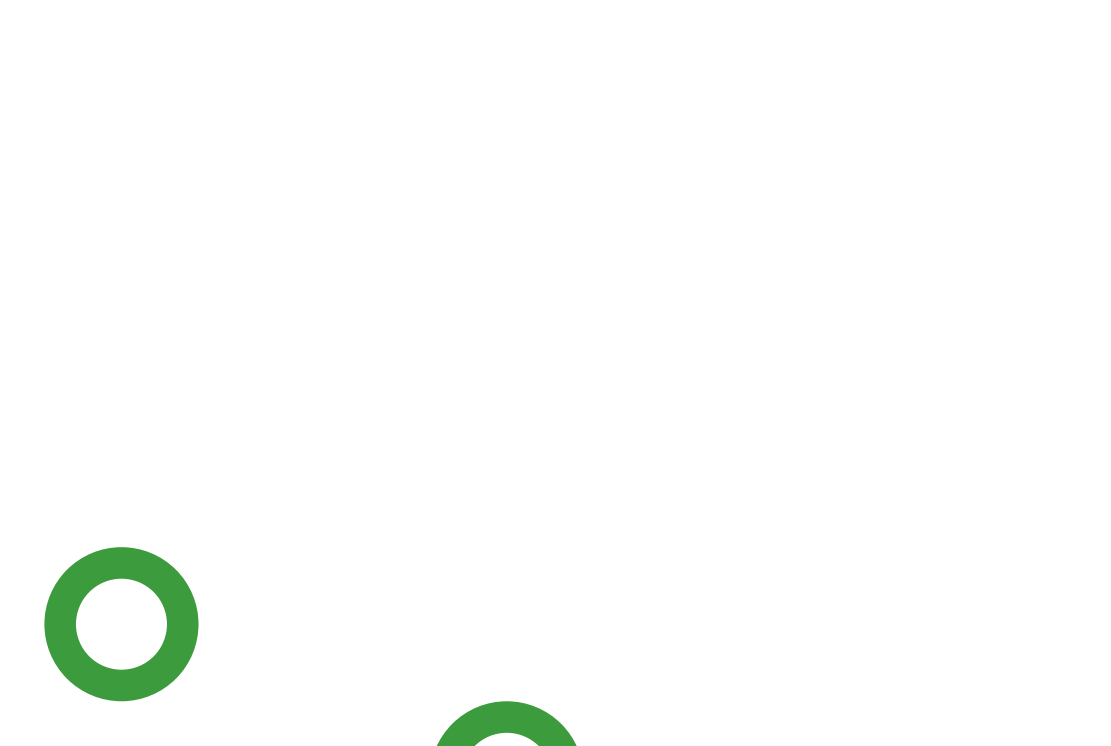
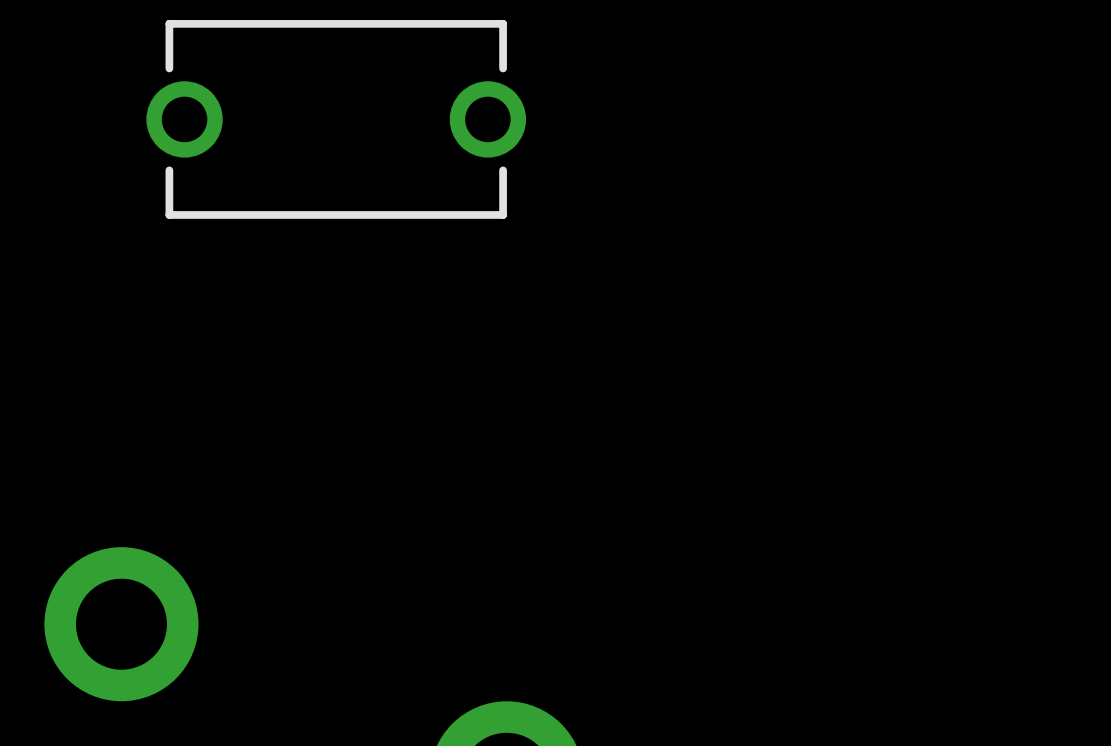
part: none -> (336, 119)

